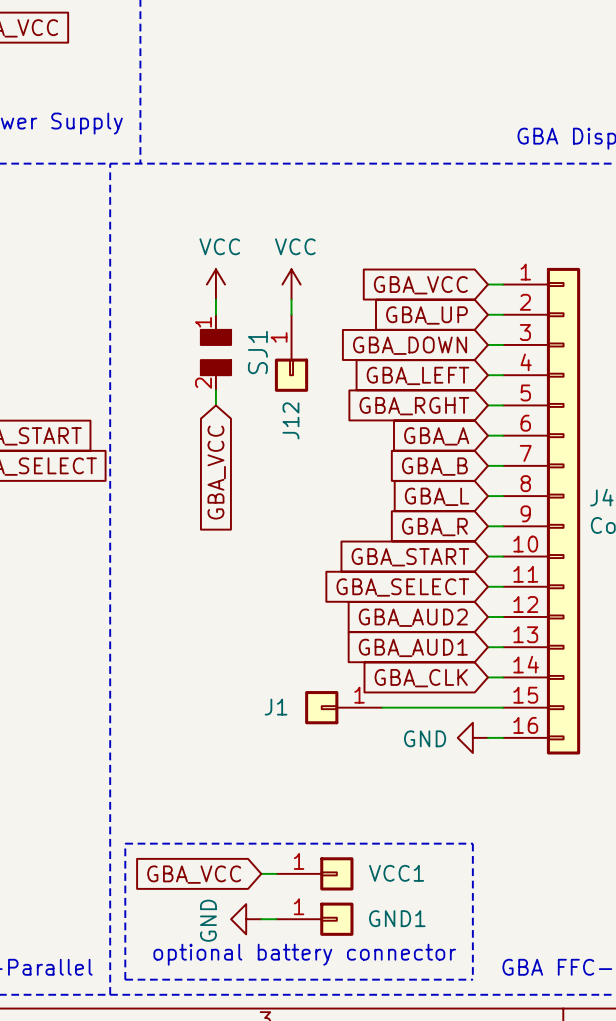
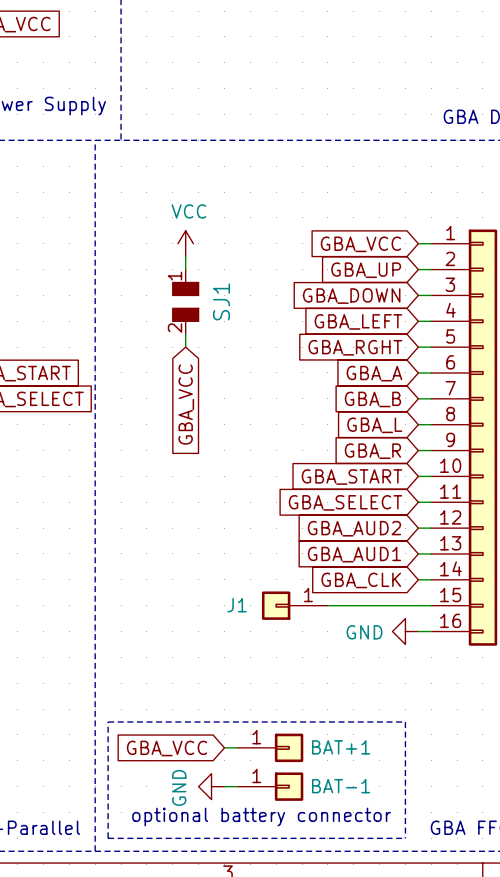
power symbol: VCC (291, 284) -> none
wire: (291, 299) (291, 314) -> none
J12: (291, 353) -> none
VCC1 name: VCC1 (396, 873) -> BAT+1 (341, 747)
GND1 name: GND1 (397, 918) -> BAT-1 (341, 786)

